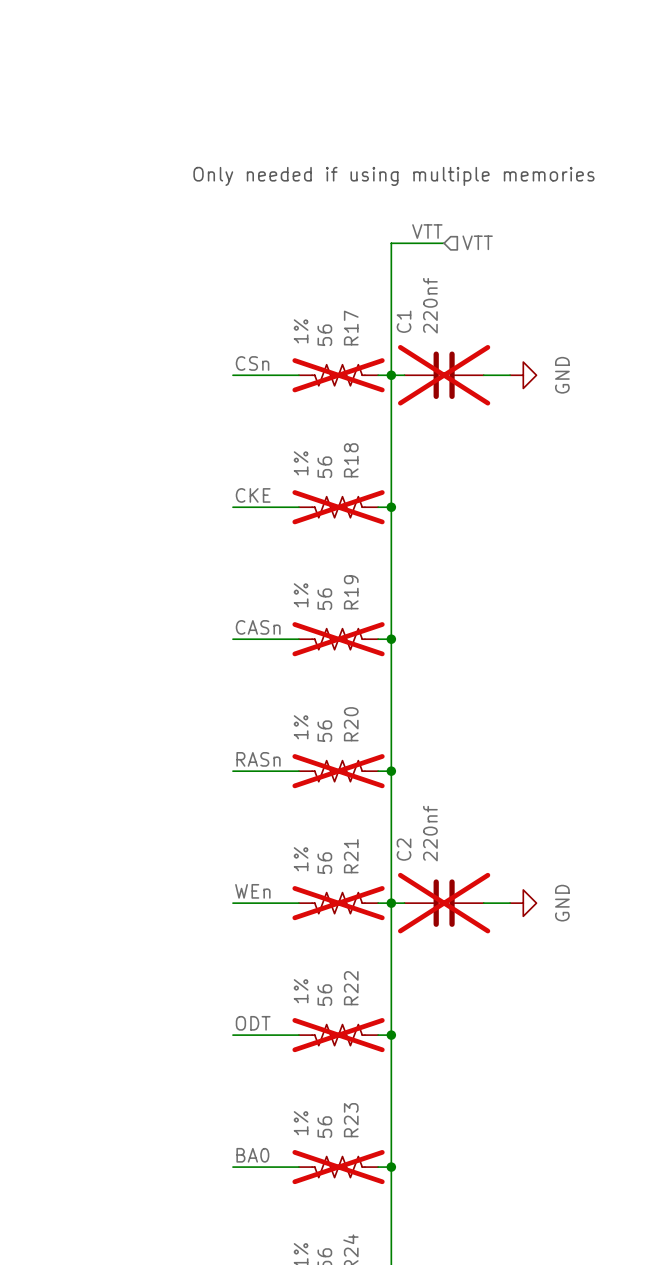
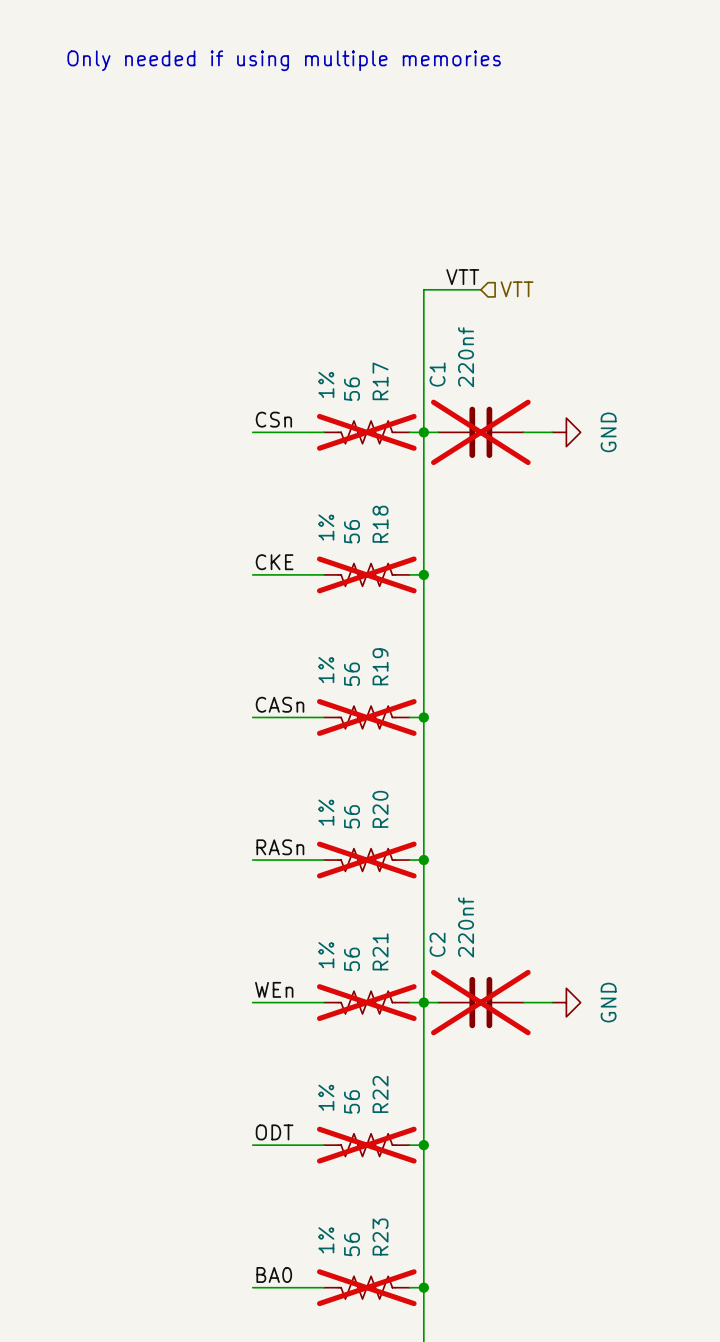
text position: Only needed if using multiple memories (393, 176) -> Only needed if using multiple memories (284, 60)

